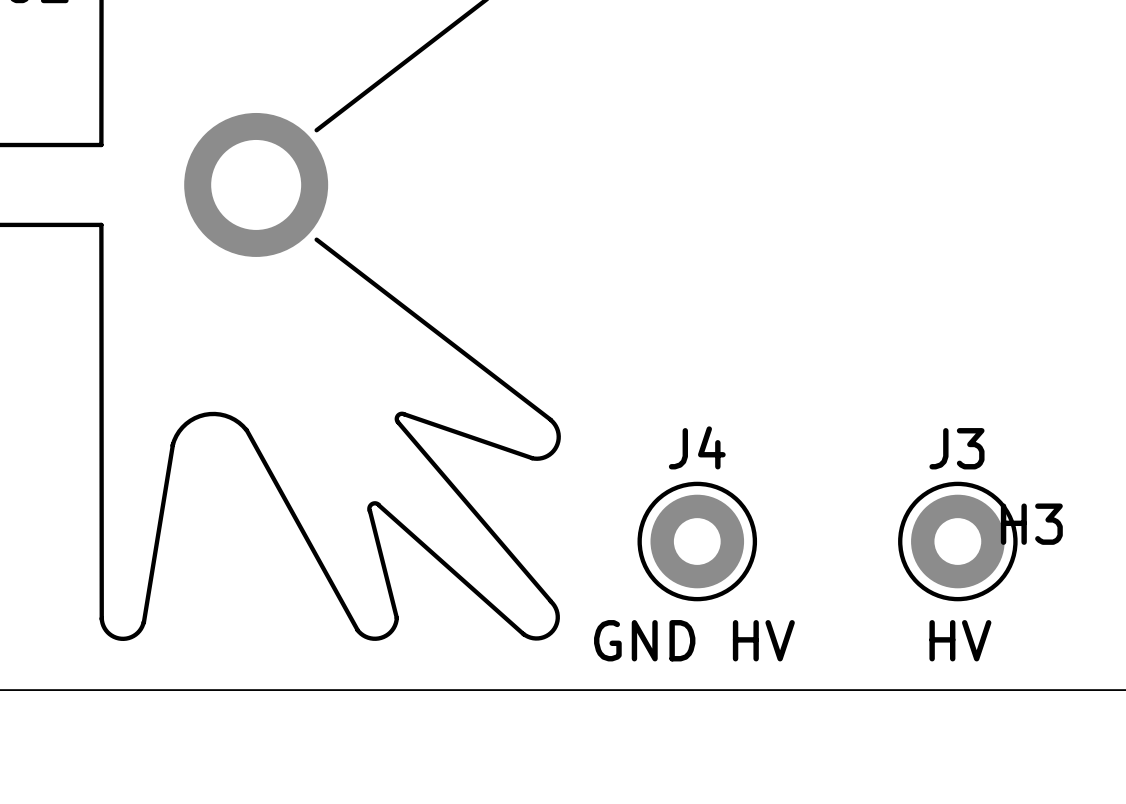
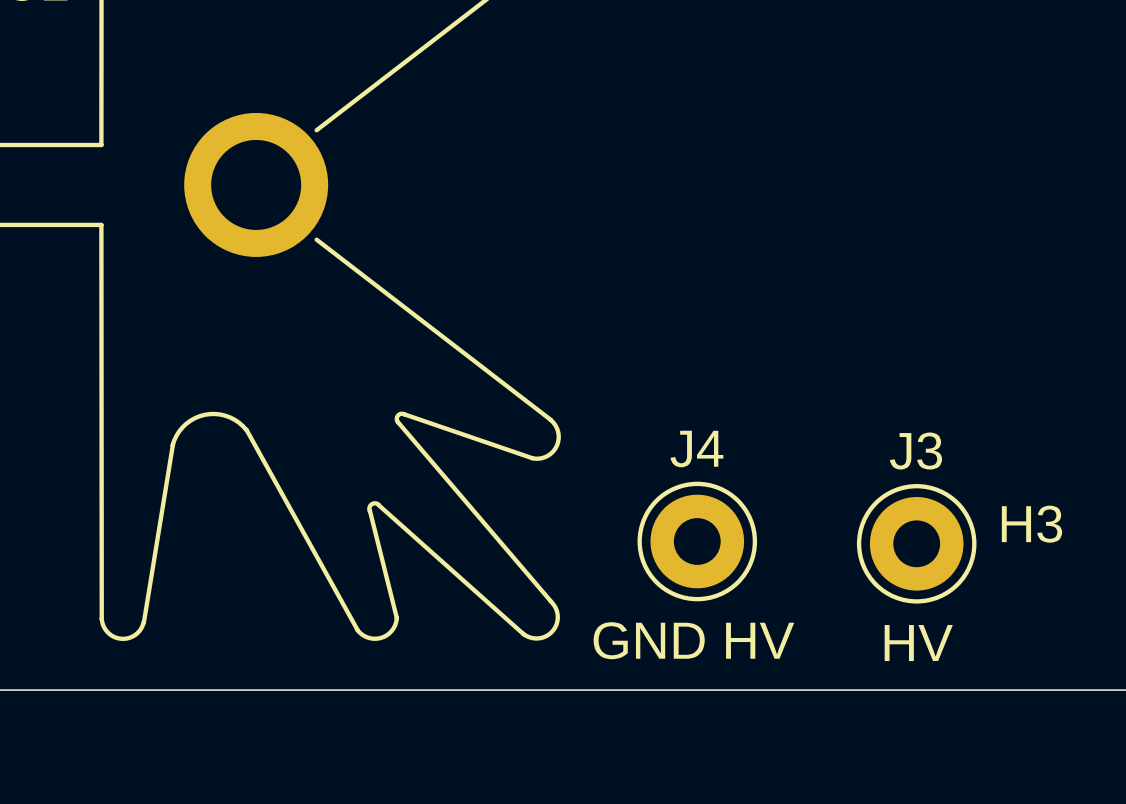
J3 position: (957, 541) -> (916, 543)
text position: HV (960, 640) -> HV (918, 643)

